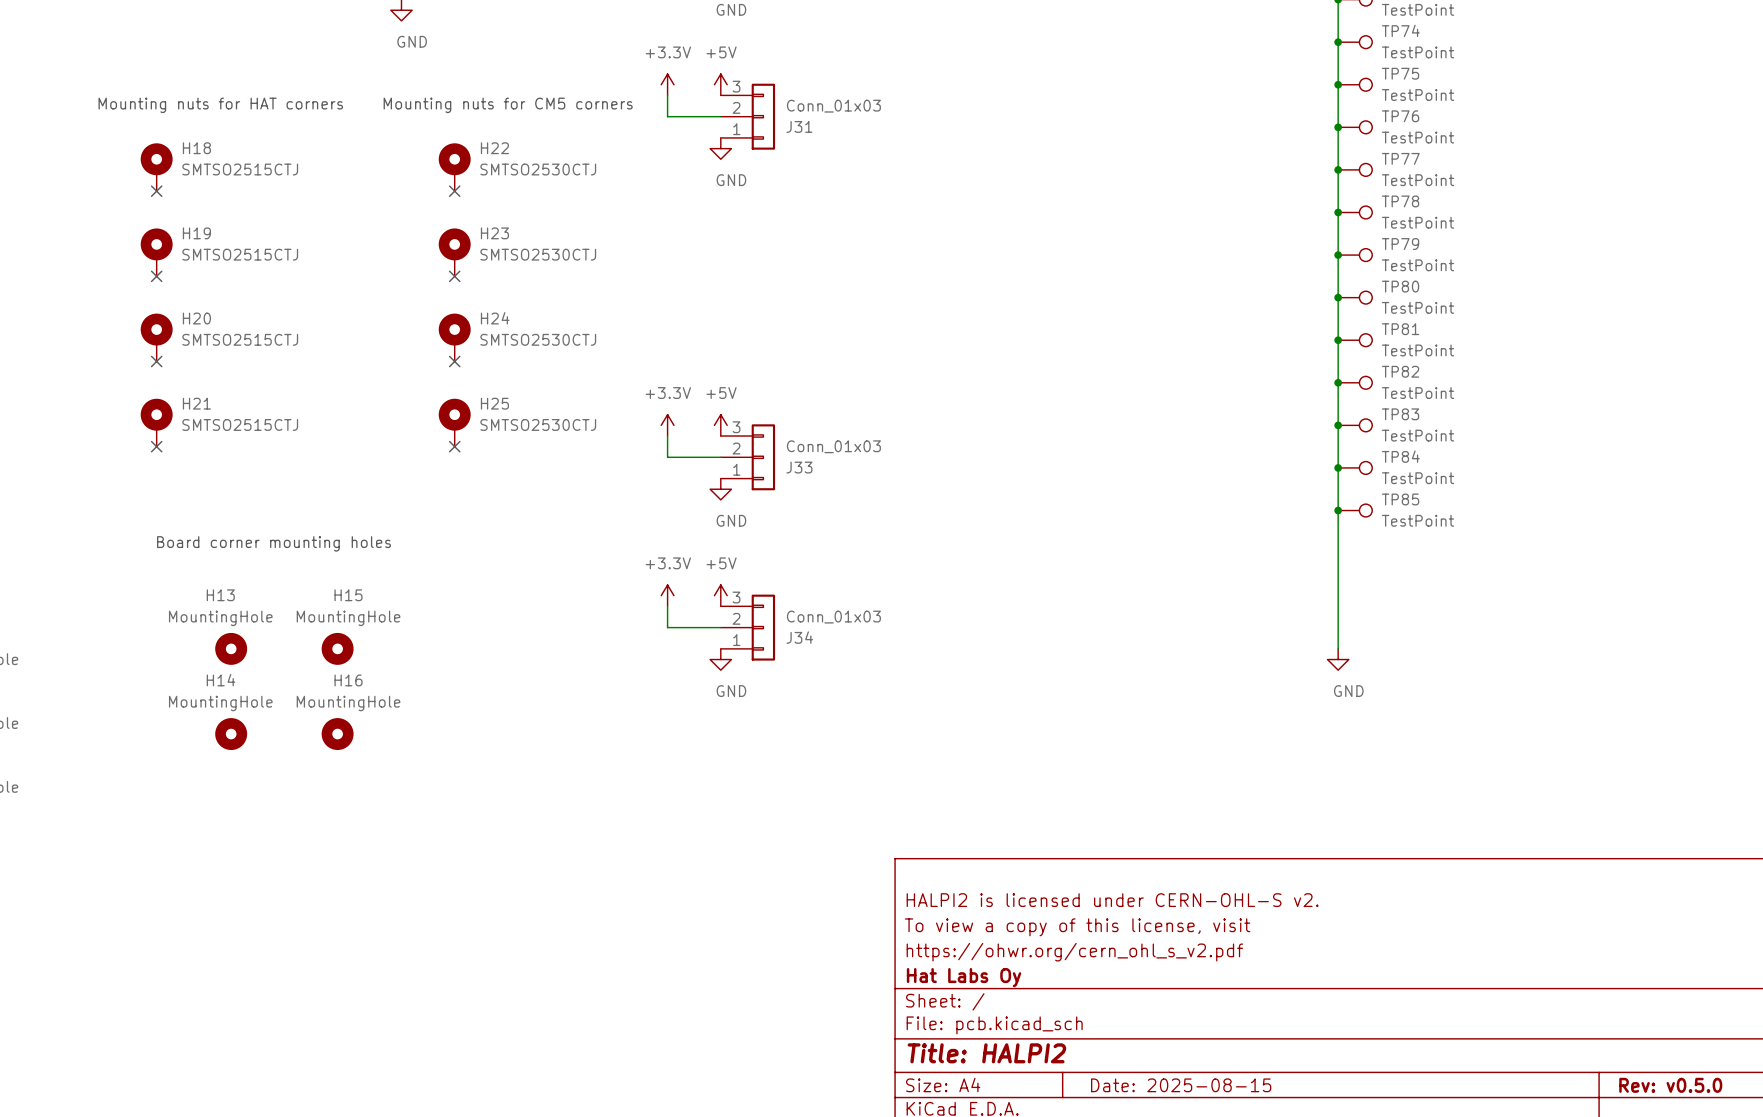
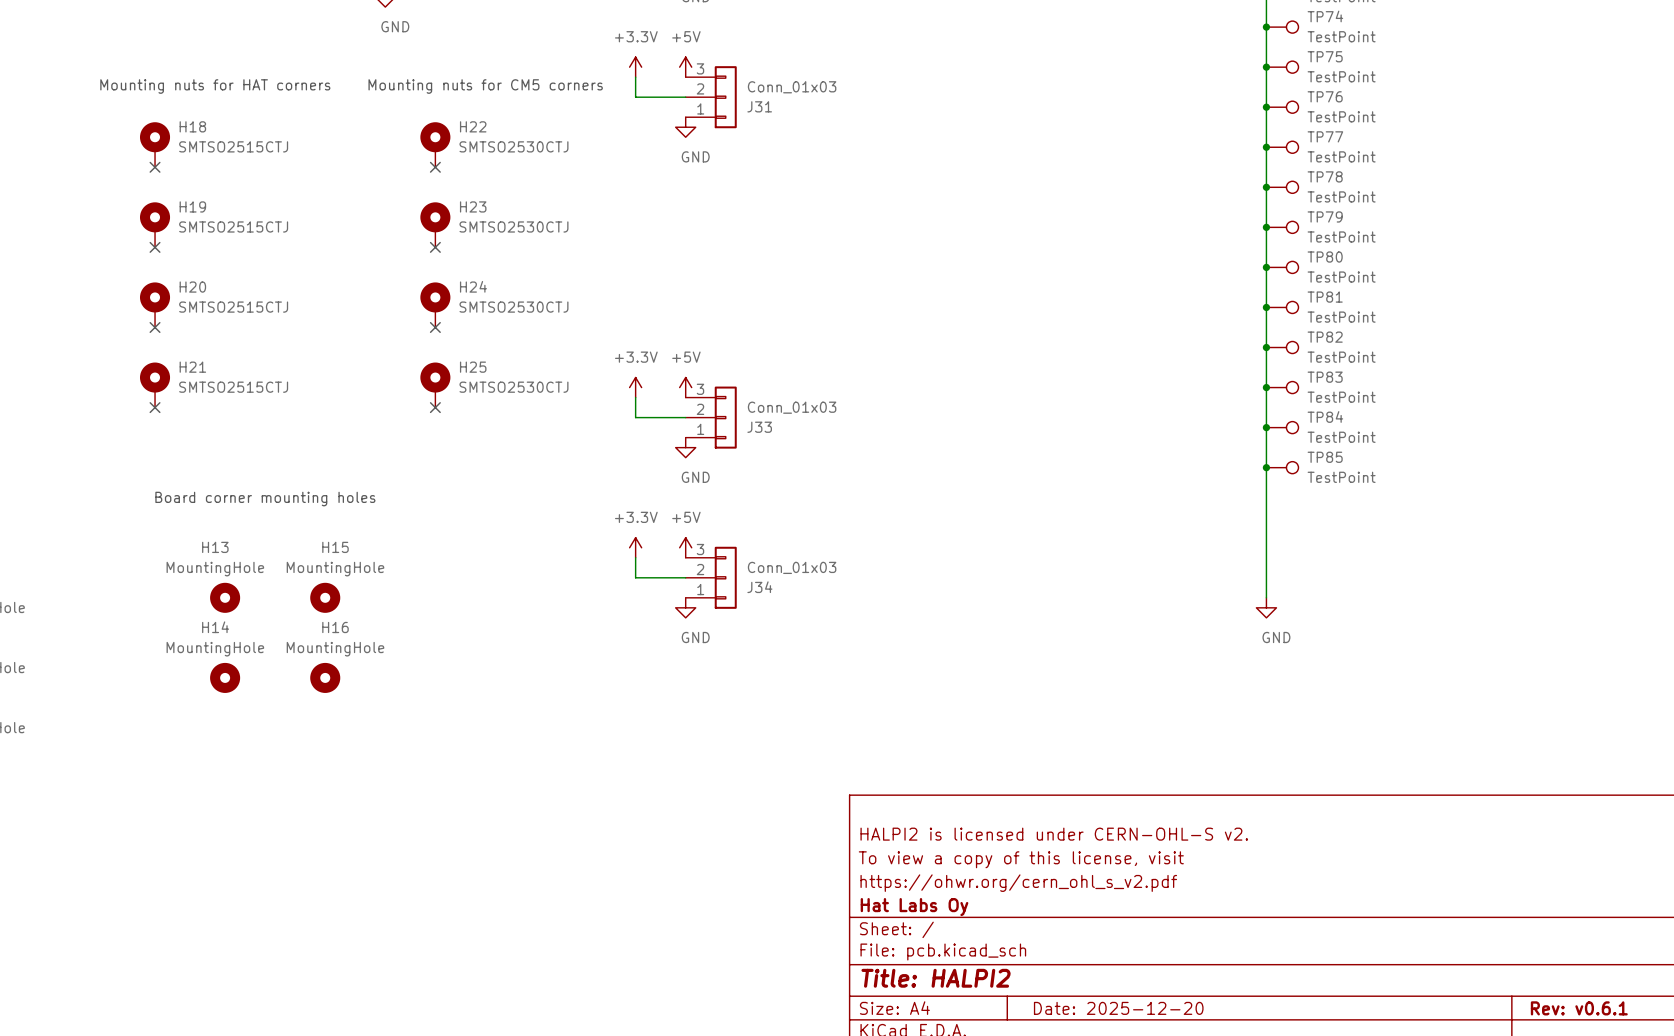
title block: Date: 2025-08-15 (1181, 1085) -> Date: 2025-12-20 (1118, 1008)
title block: Rev: v0.5.0 (1670, 1085) -> Rev: v0.6.1 (1579, 1008)

